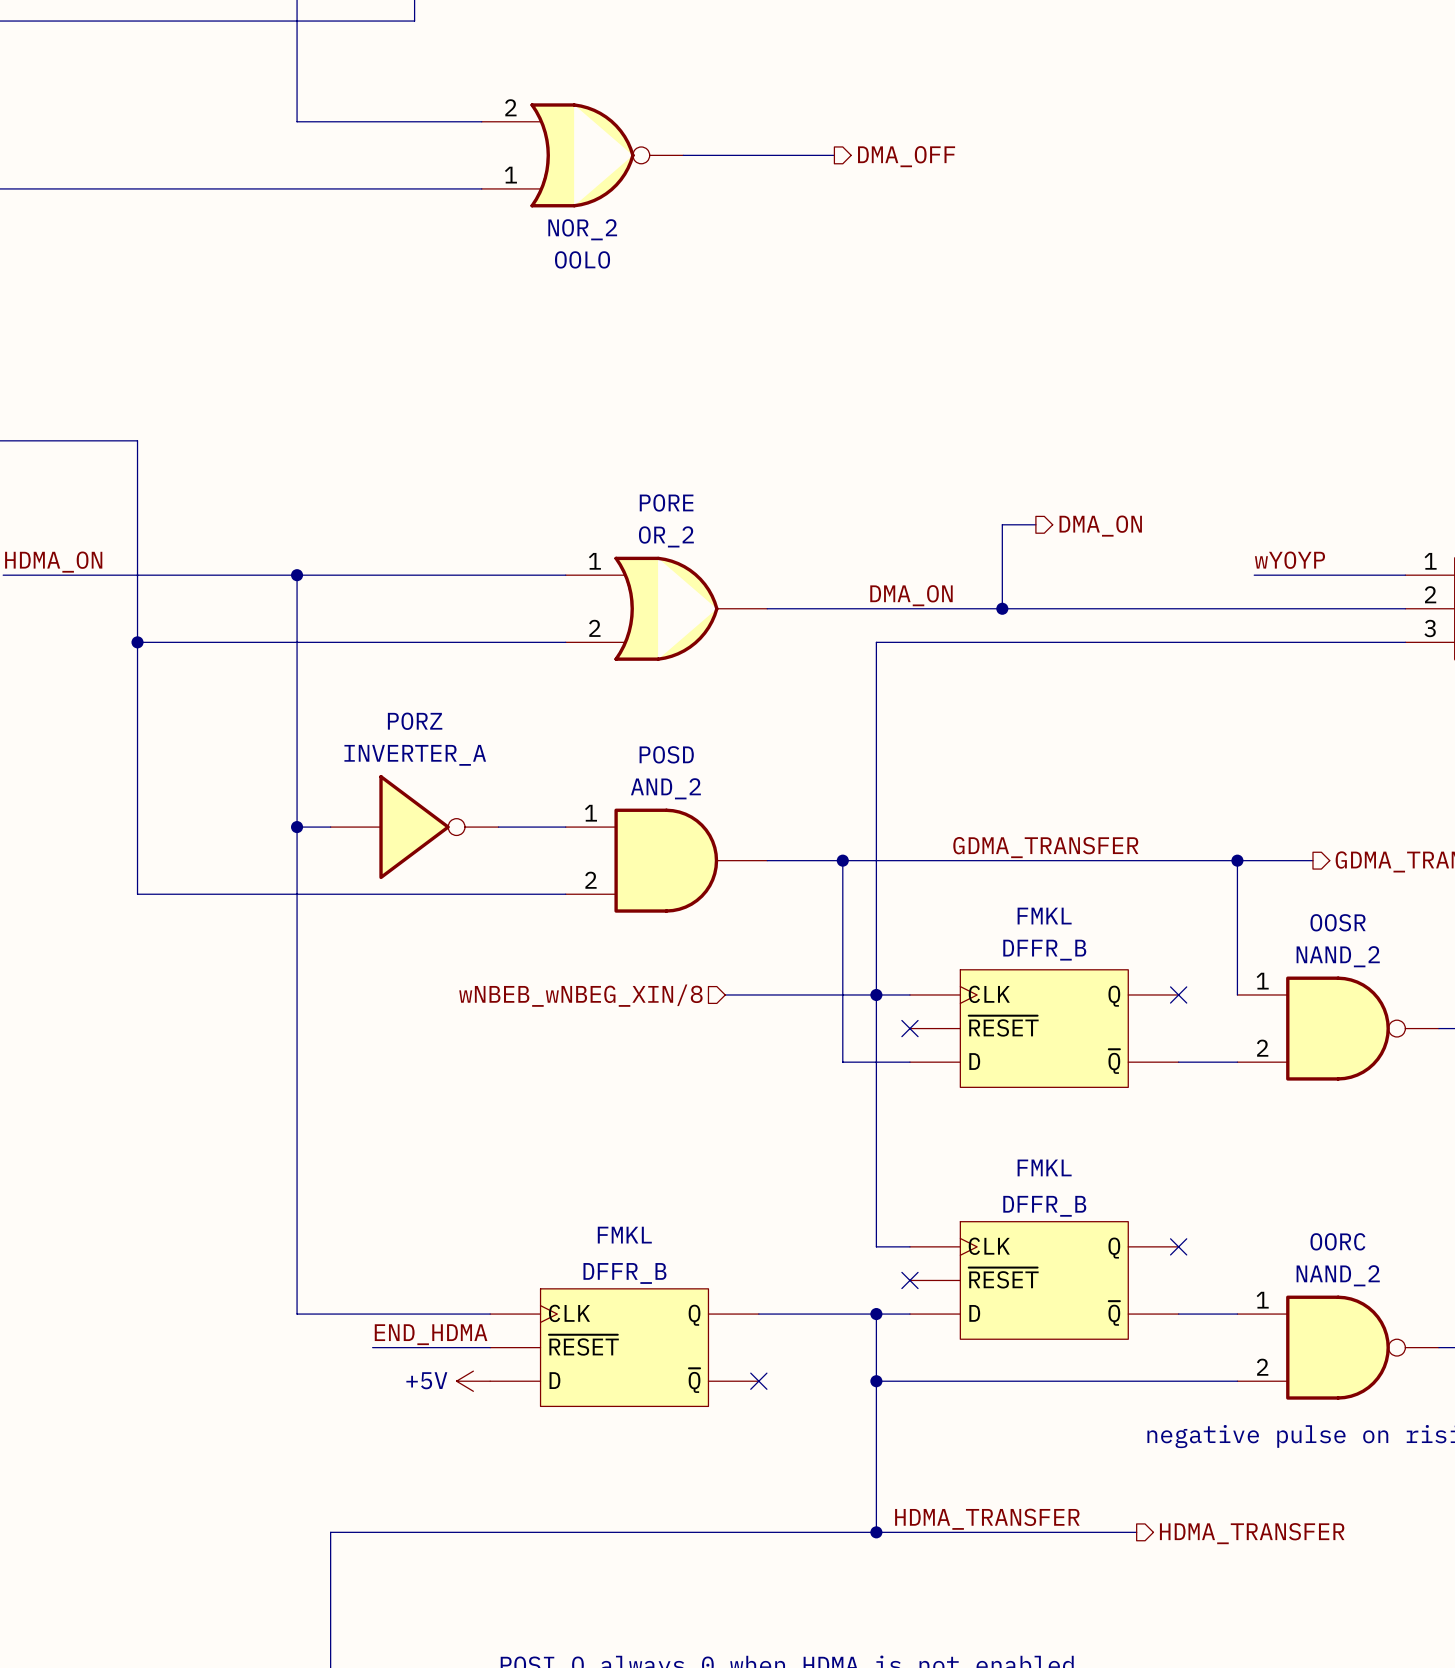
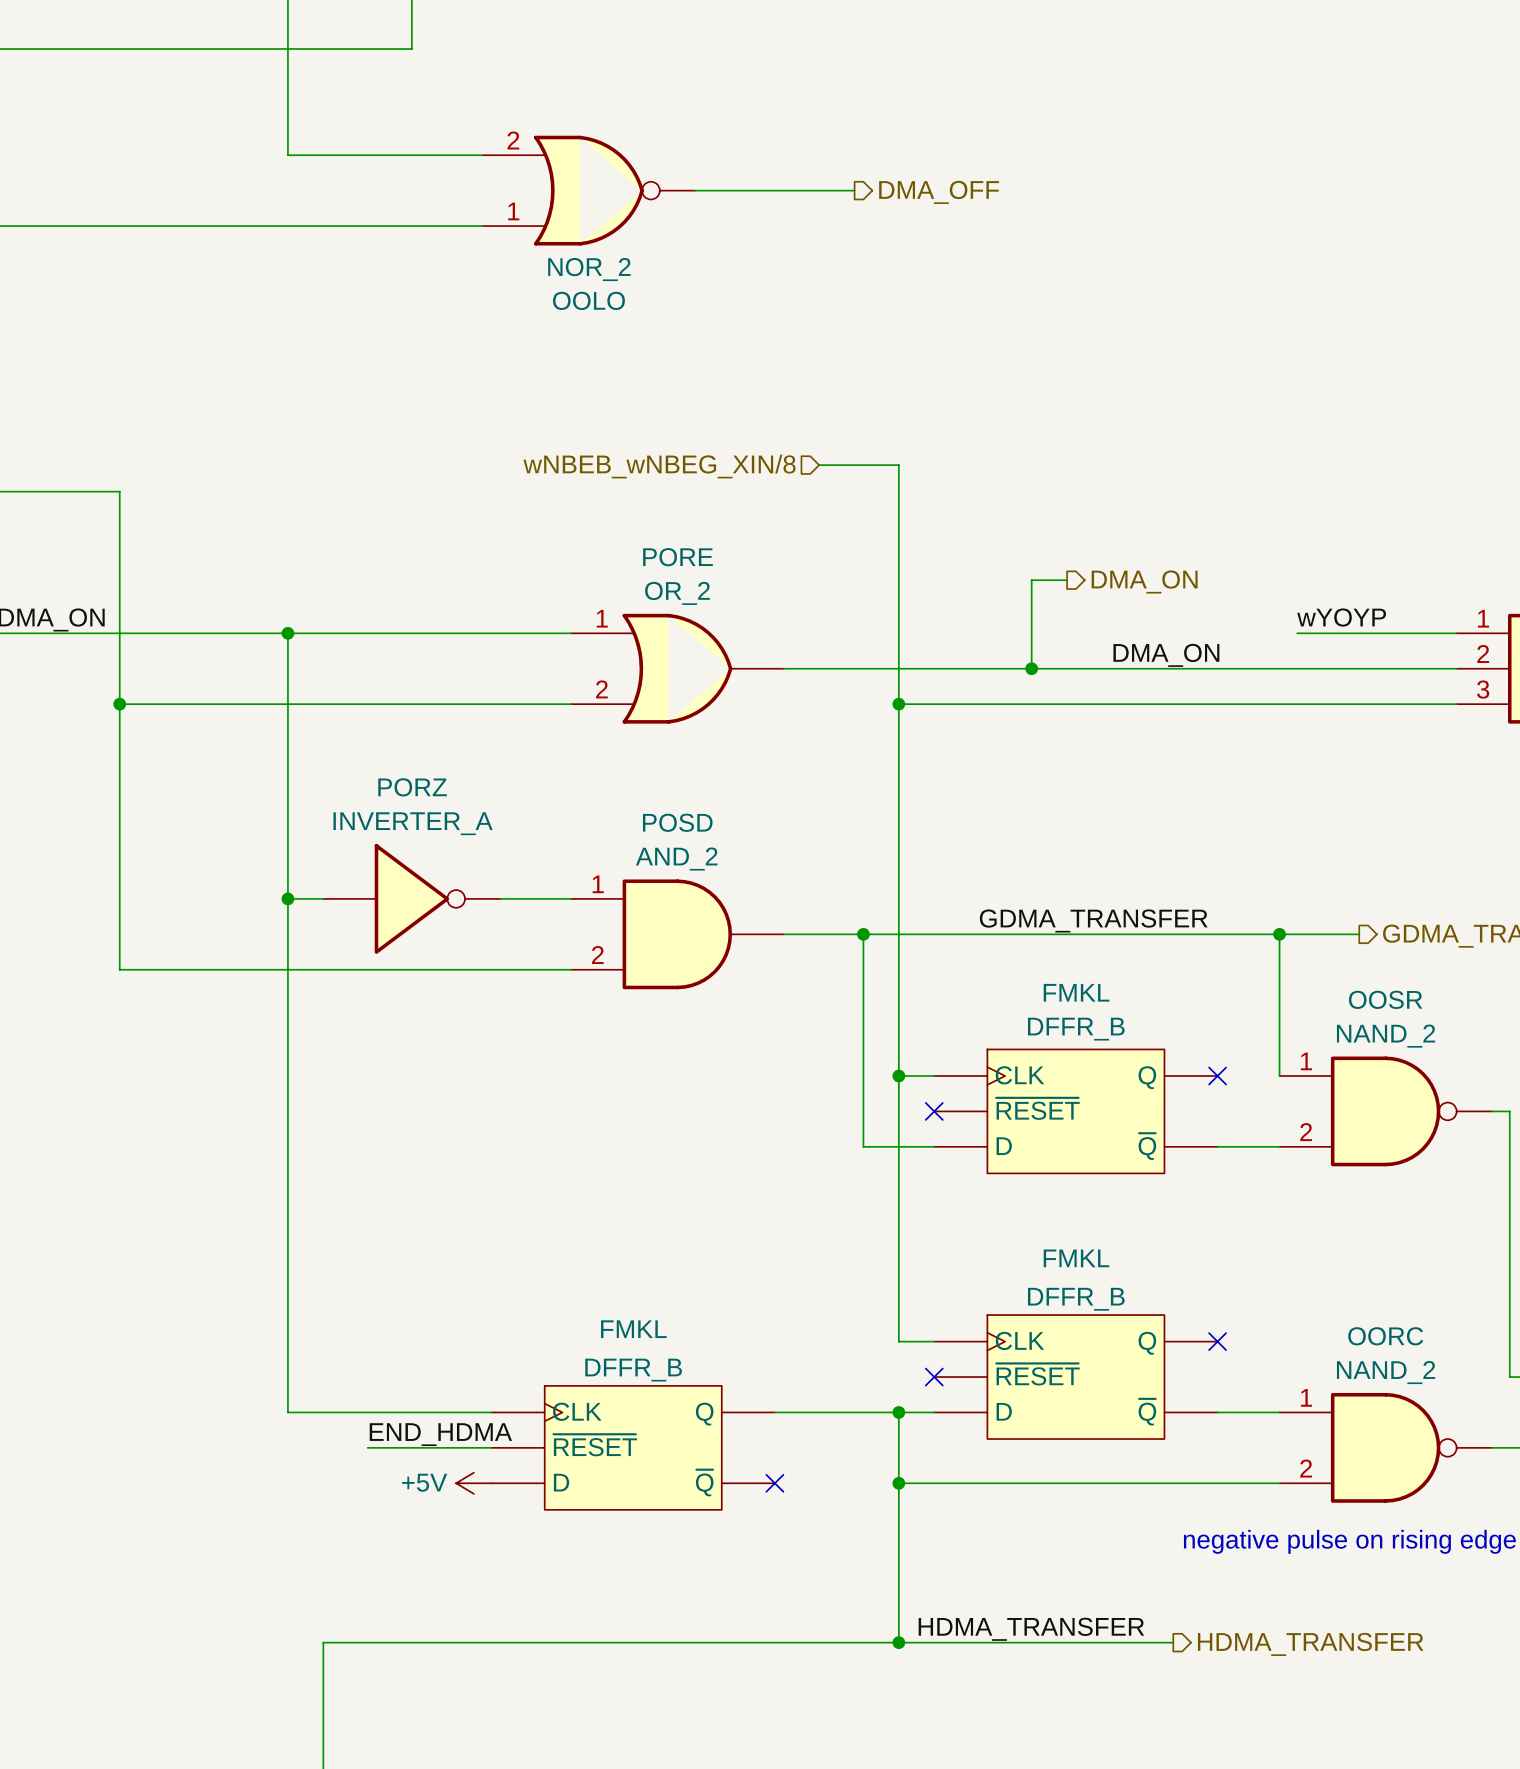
wire: none -> (819, 465) (898, 465) (898, 704)
hierarchical label: none -> wNBEB_wNBEG_XIN/8 (659, 466)
label position: DMA_ON (911, 595) -> DMA_ON (1166, 655)
junction: none -> (898, 704)
wire: (725, 994) (876, 994) -> none
hierarchical label: wNBEB_wNBEG_XIN/8 (580, 995) -> none

